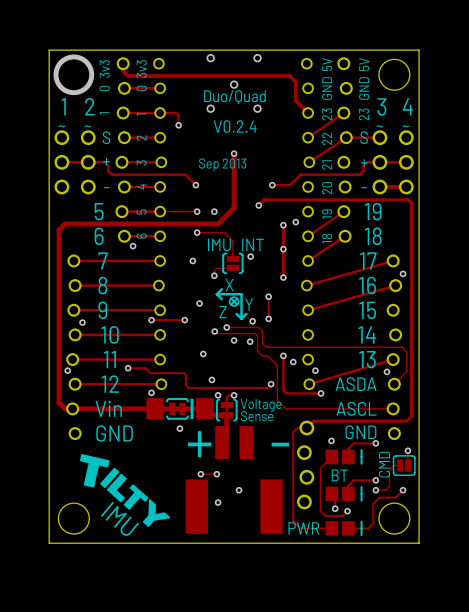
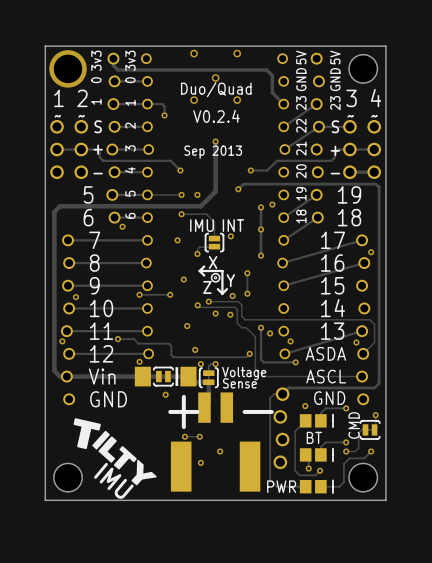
line: (231, 298) (237, 304) -> none
line: (237, 298) (231, 304) -> none
drawing: none -> [213, 276, 218, 280]
part footprint: [392, 455, 416, 477] -> [359, 419, 381, 440]

